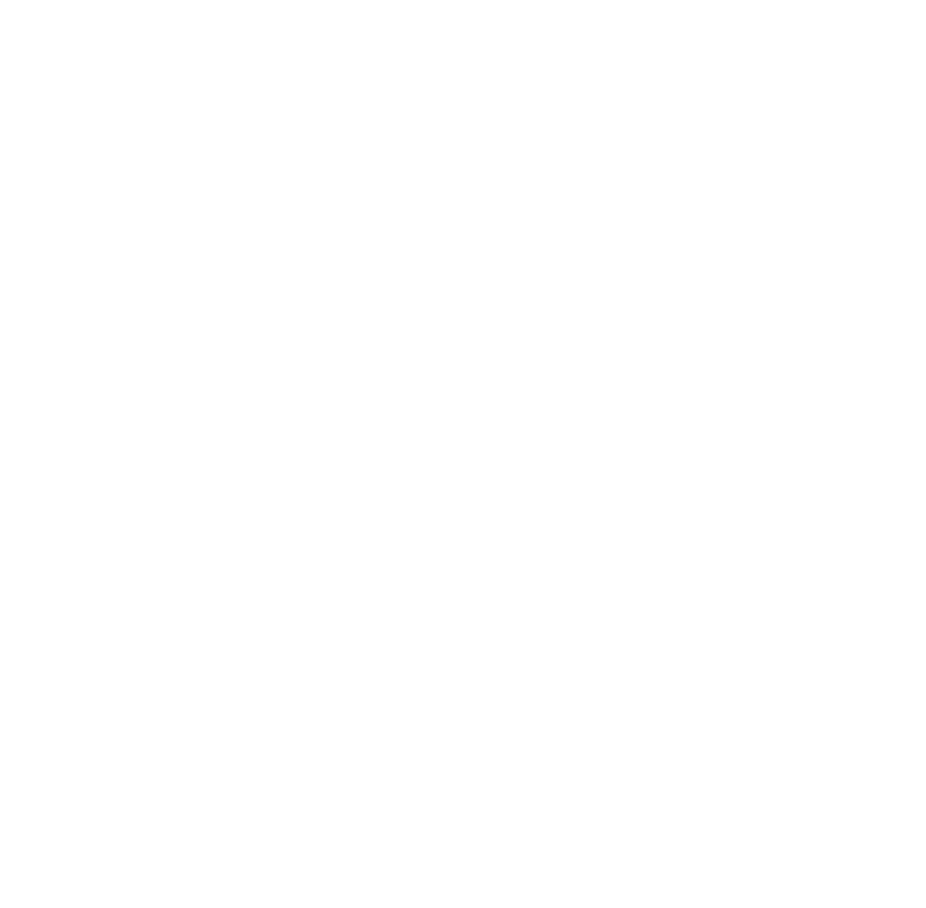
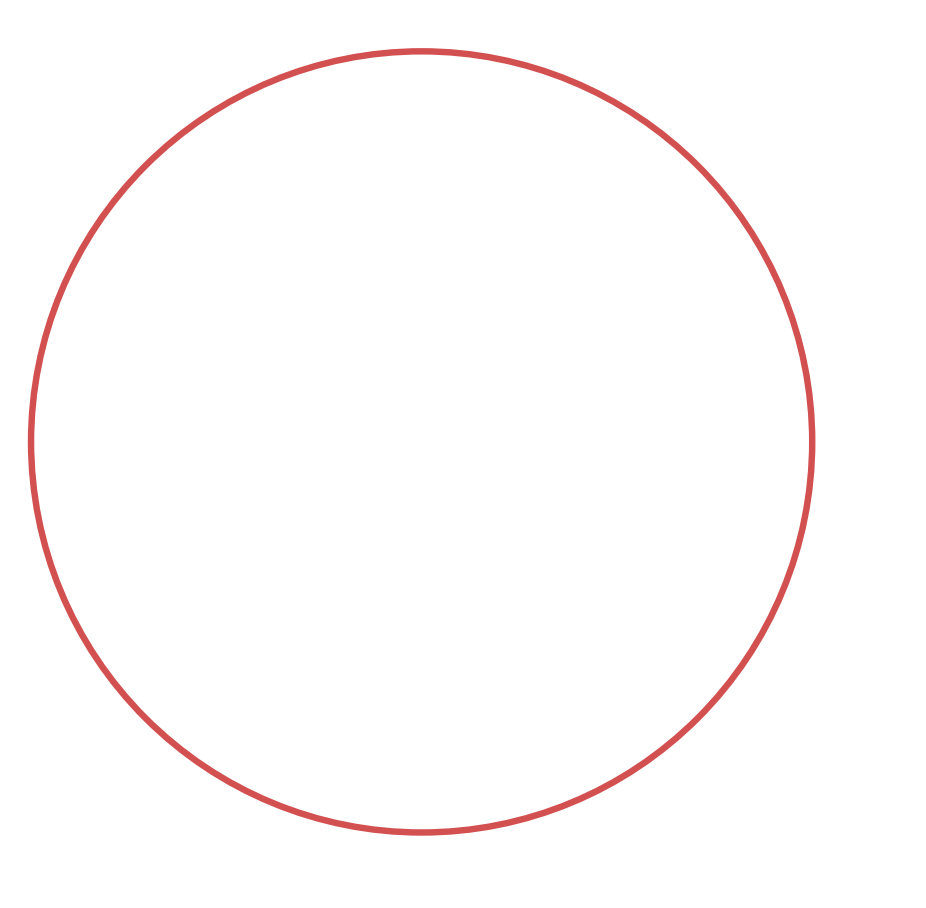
drawing: none -> [27, 48, 816, 836]

